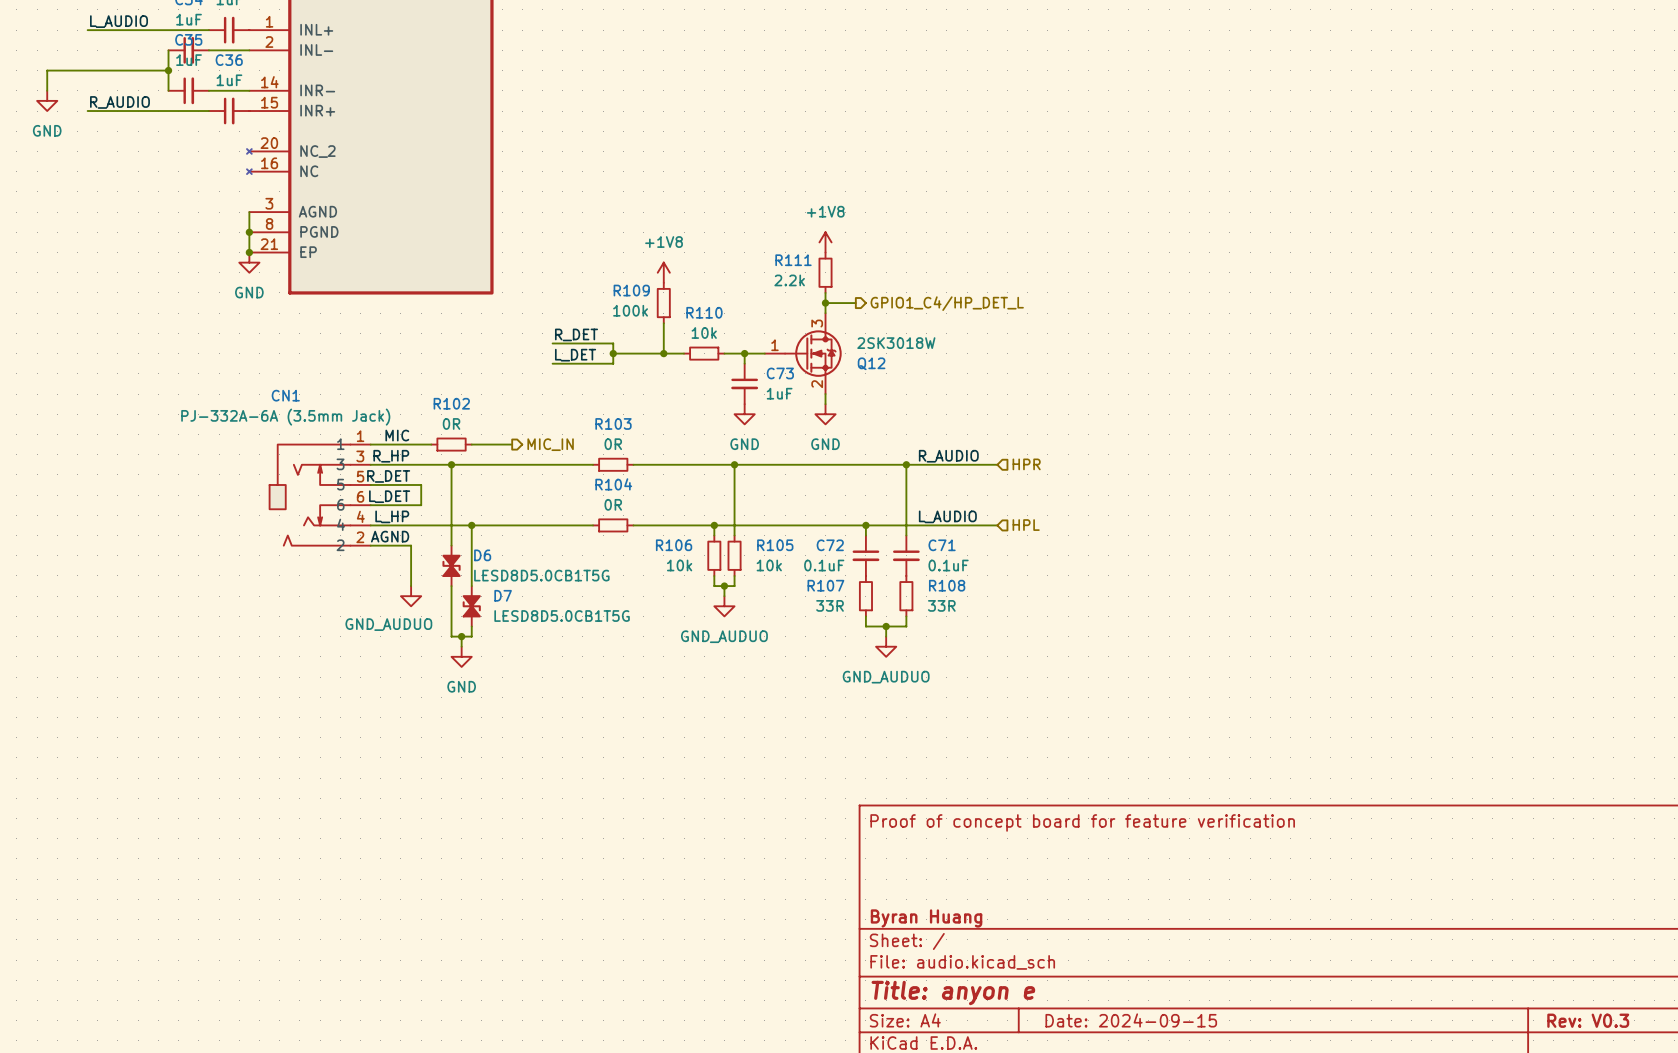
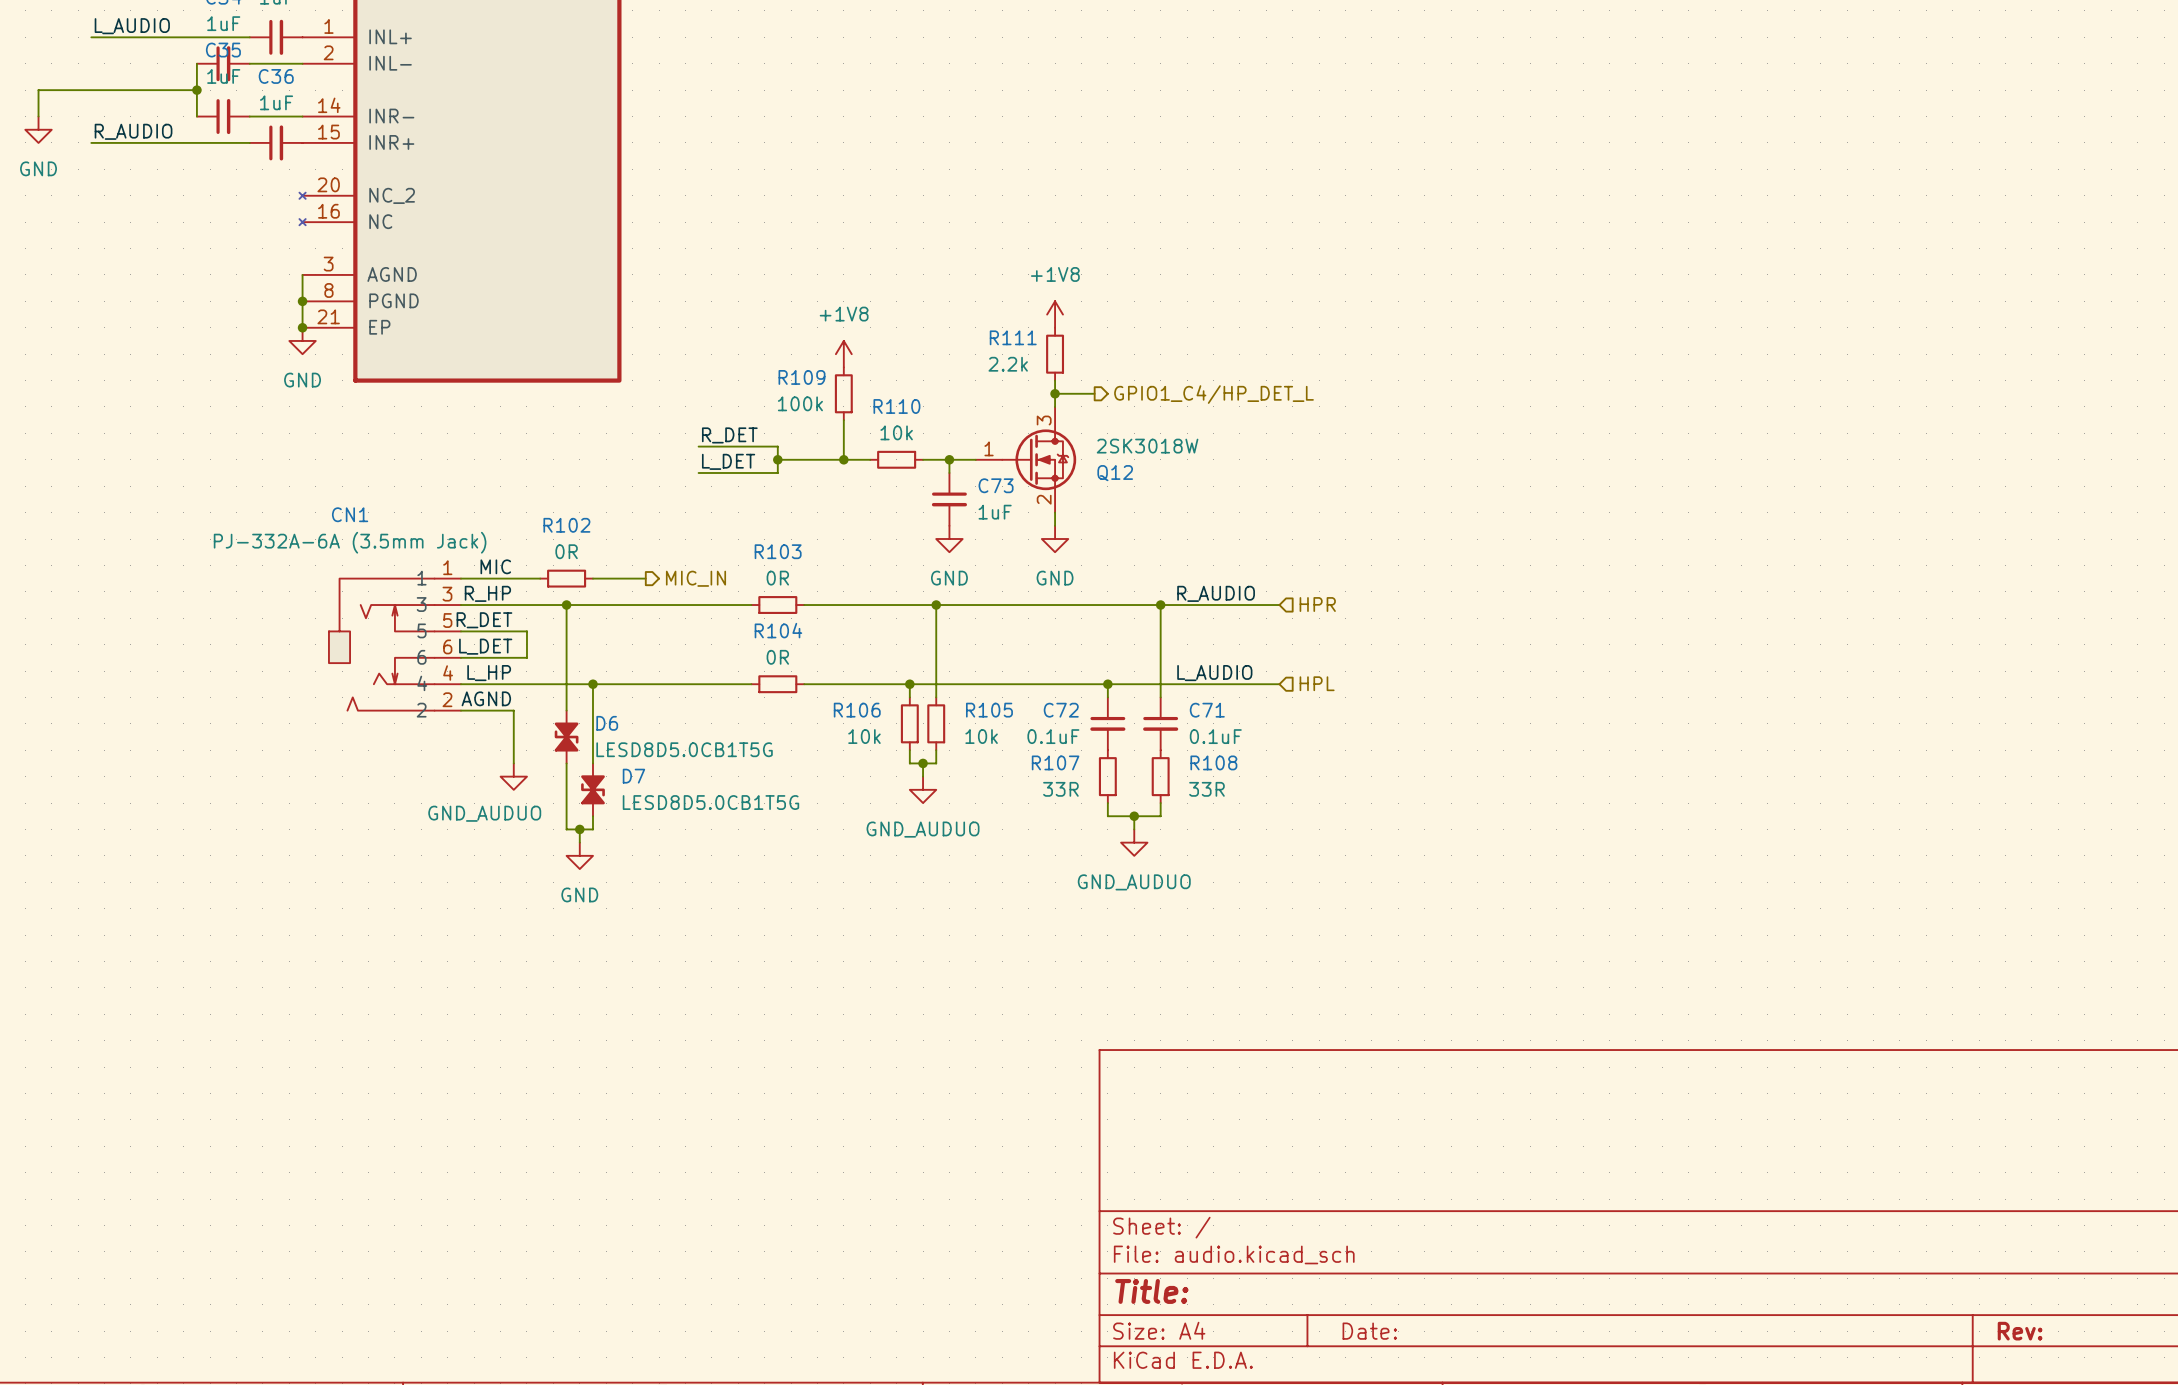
title block: Proof of concept board for feature verification (1082, 822) -> none
title block: Byran Huang (926, 918) -> none
title block: Title: anyon e (953, 992) -> Title: (1151, 1291)
title block: Date: 2024-09-15 (1131, 1020) -> Date: (1369, 1331)
title block: Rev: V0.3 (1588, 1020) -> Rev: (2020, 1331)

